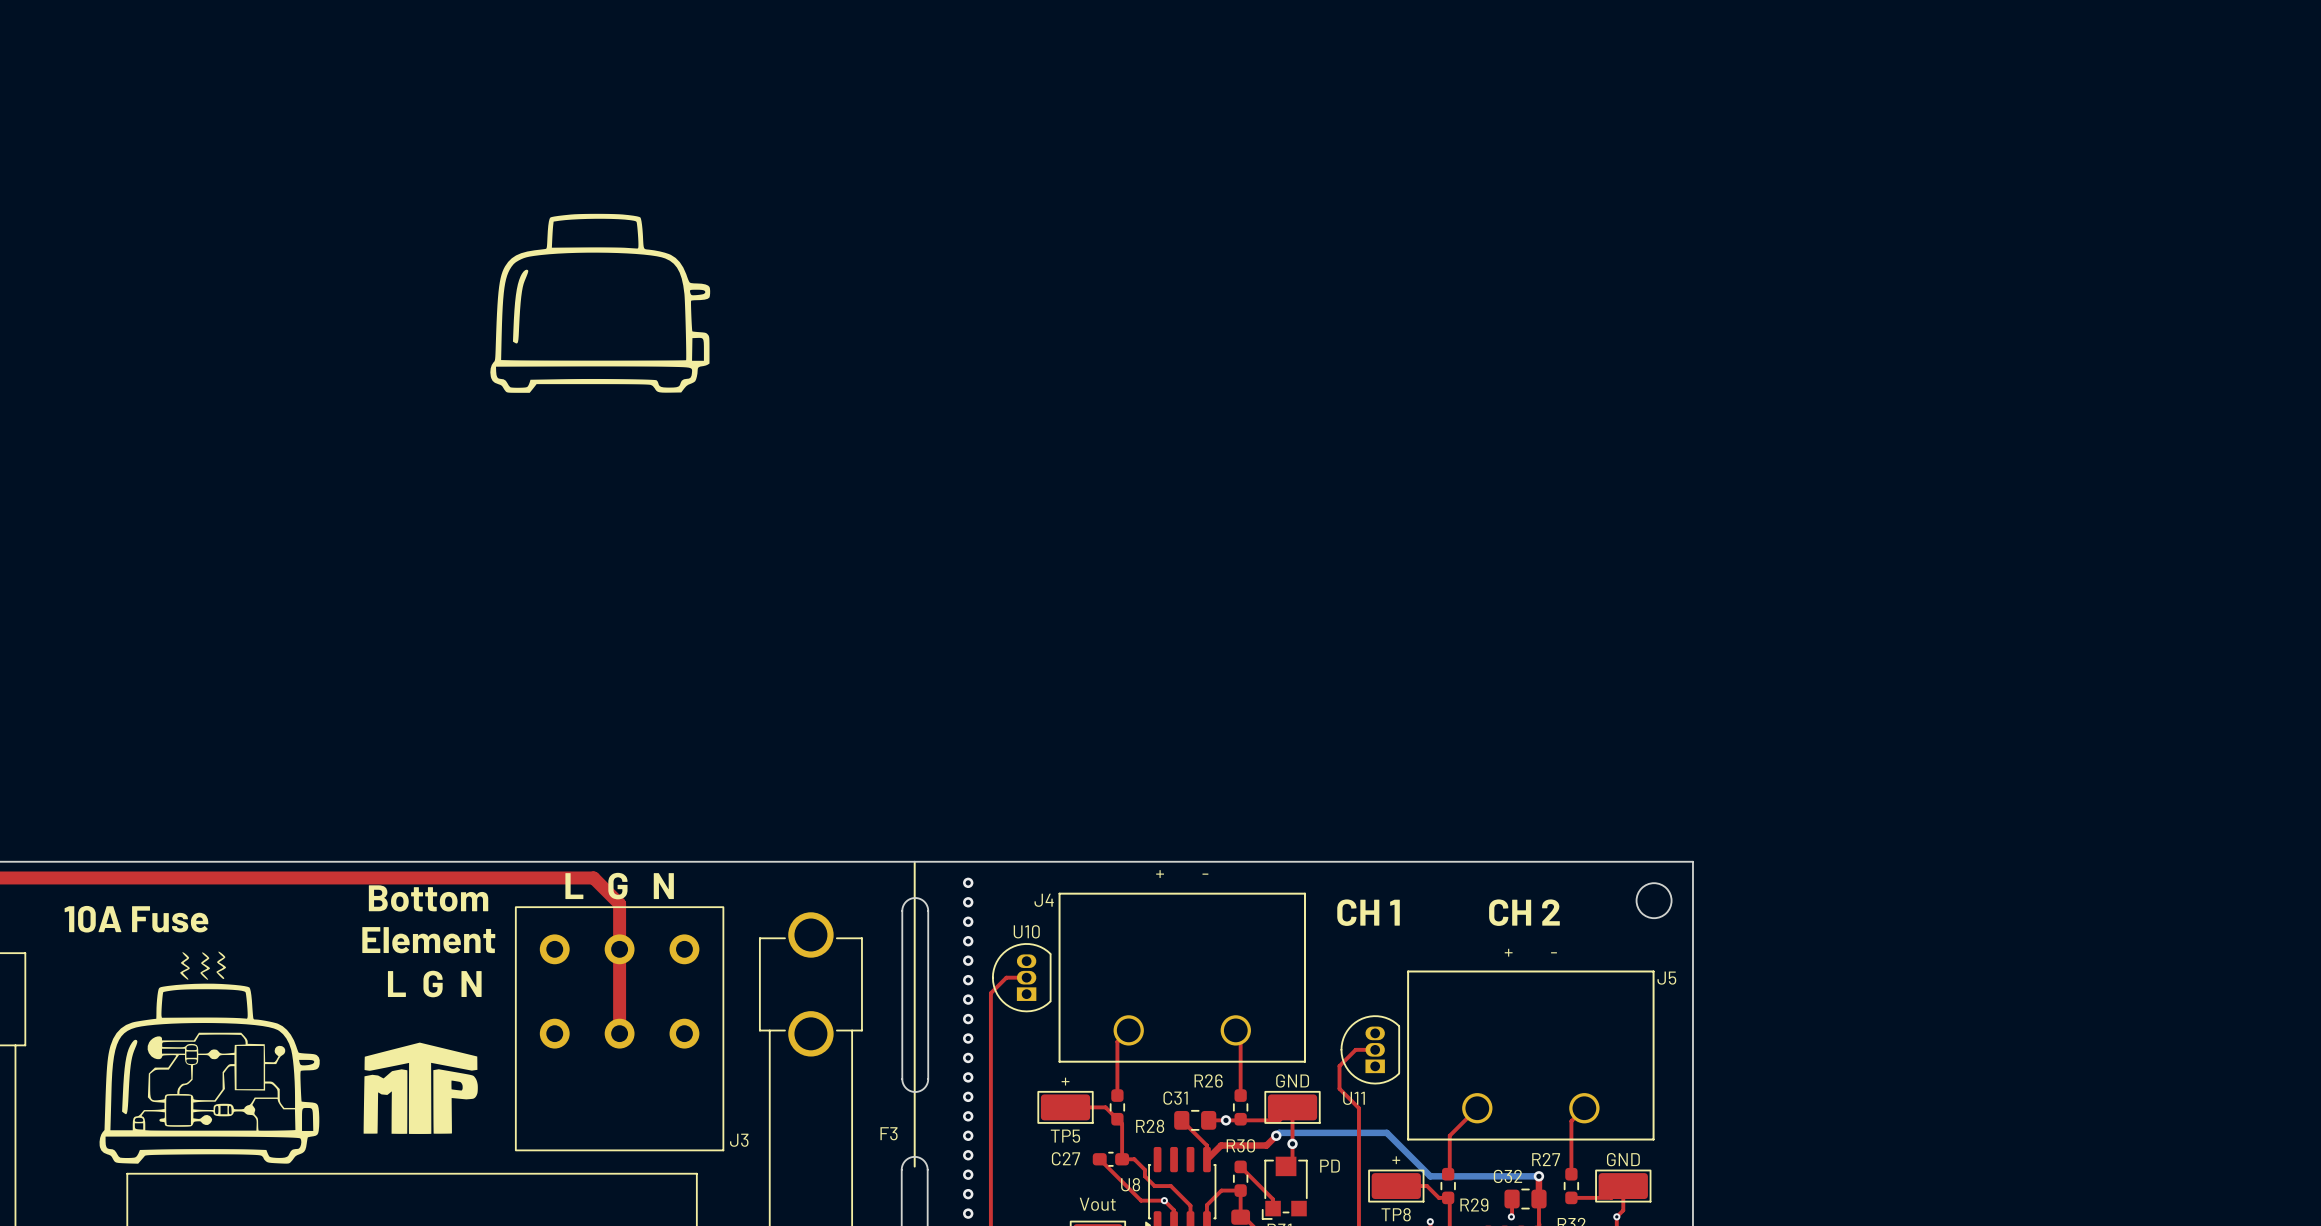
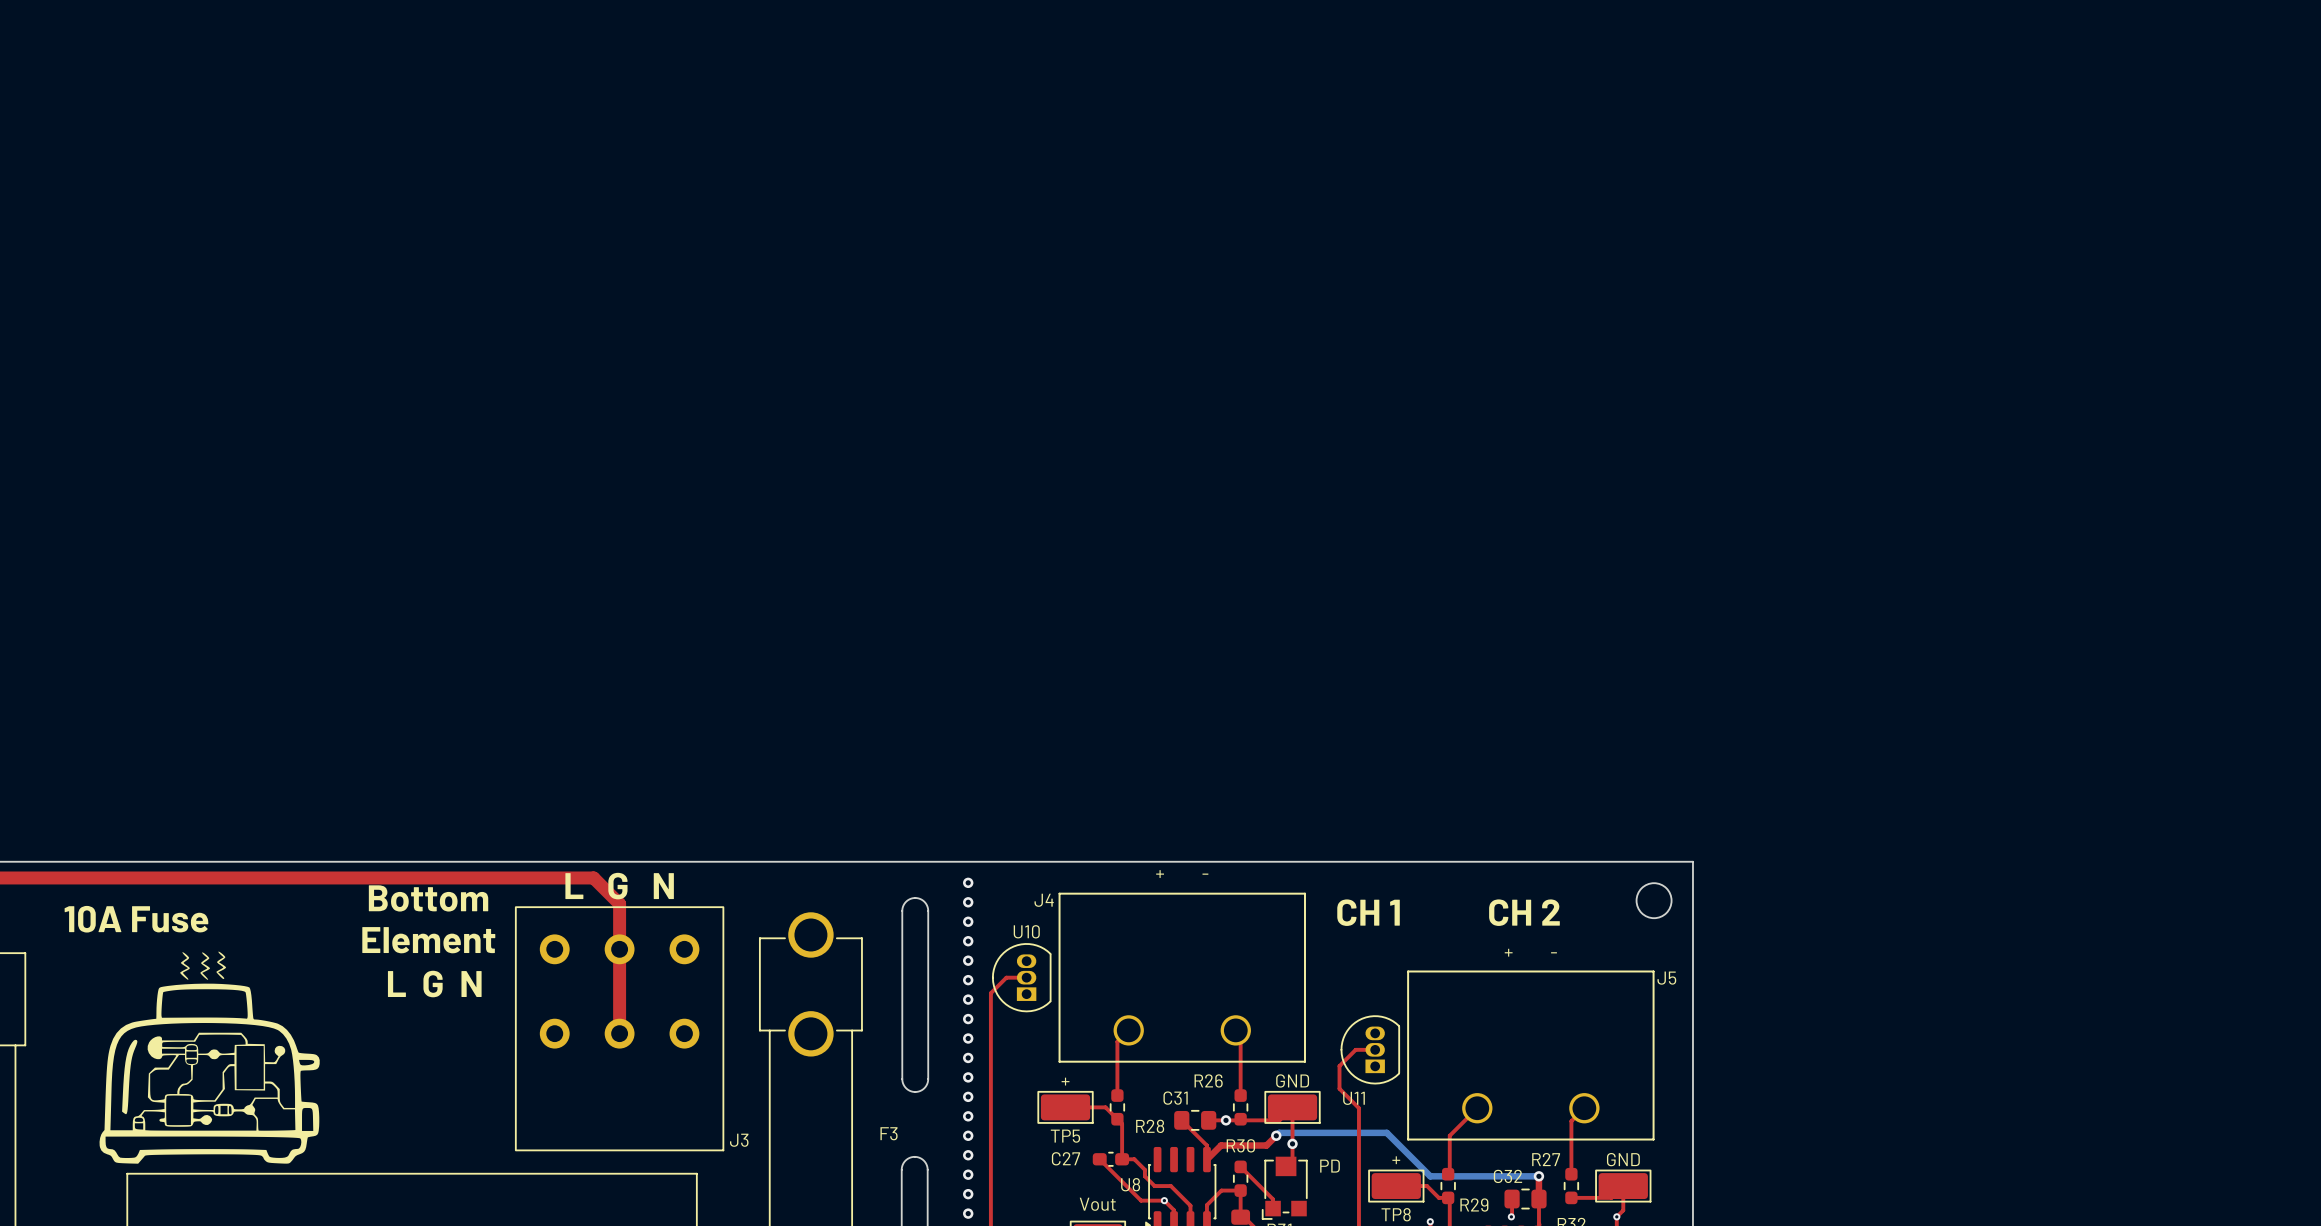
drawing: [490, 213, 711, 393] -> none
line: (914, 861) (914, 1166) -> none
drawing: [363, 1042, 478, 1134] -> none

